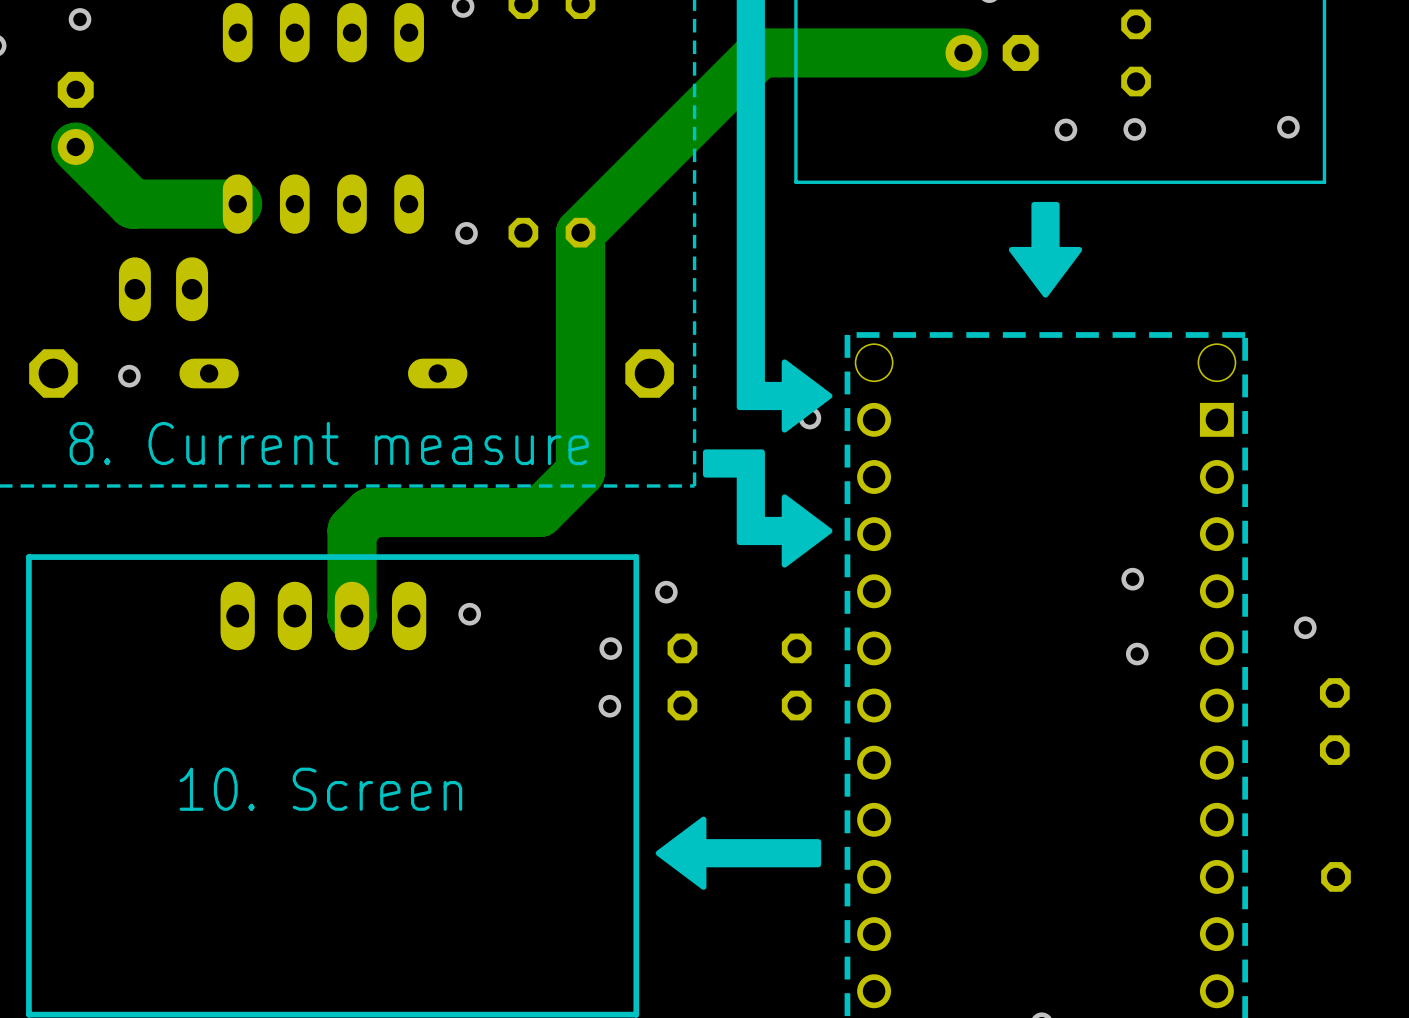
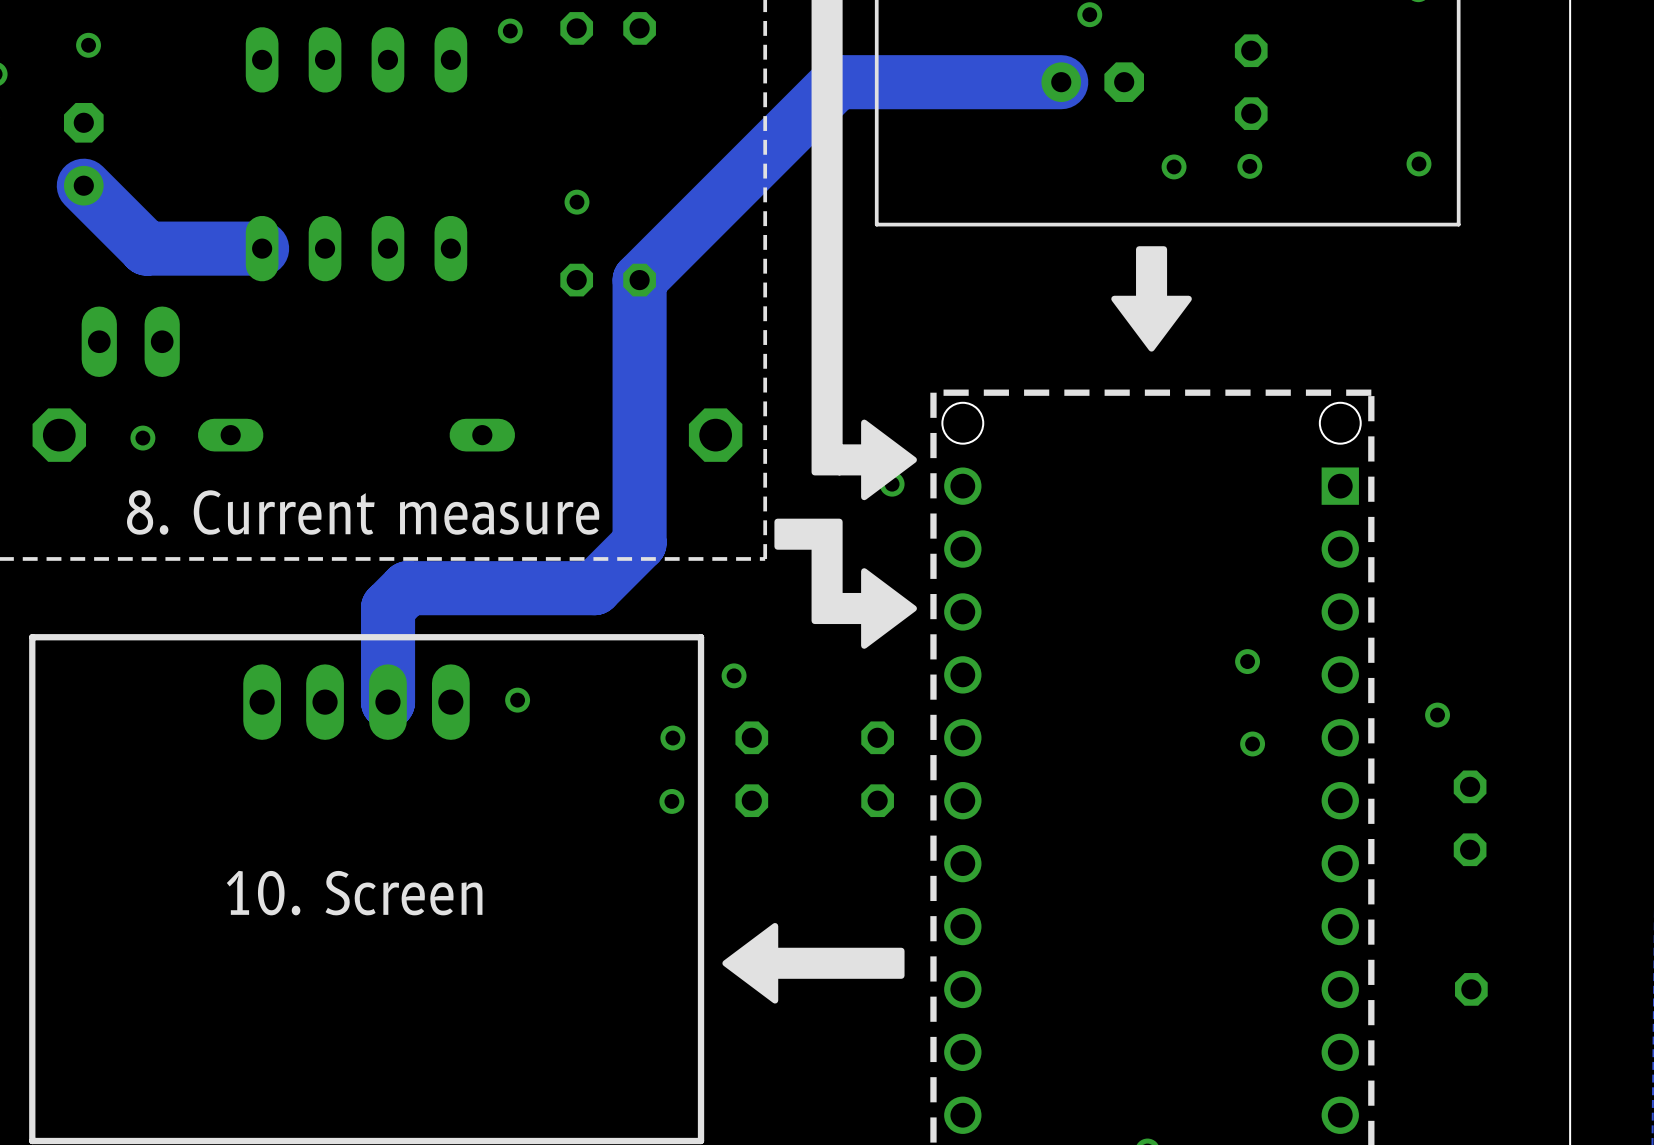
via position: (466, 233) -> (576, 202)
part position: (163, 289) -> (130, 341)

